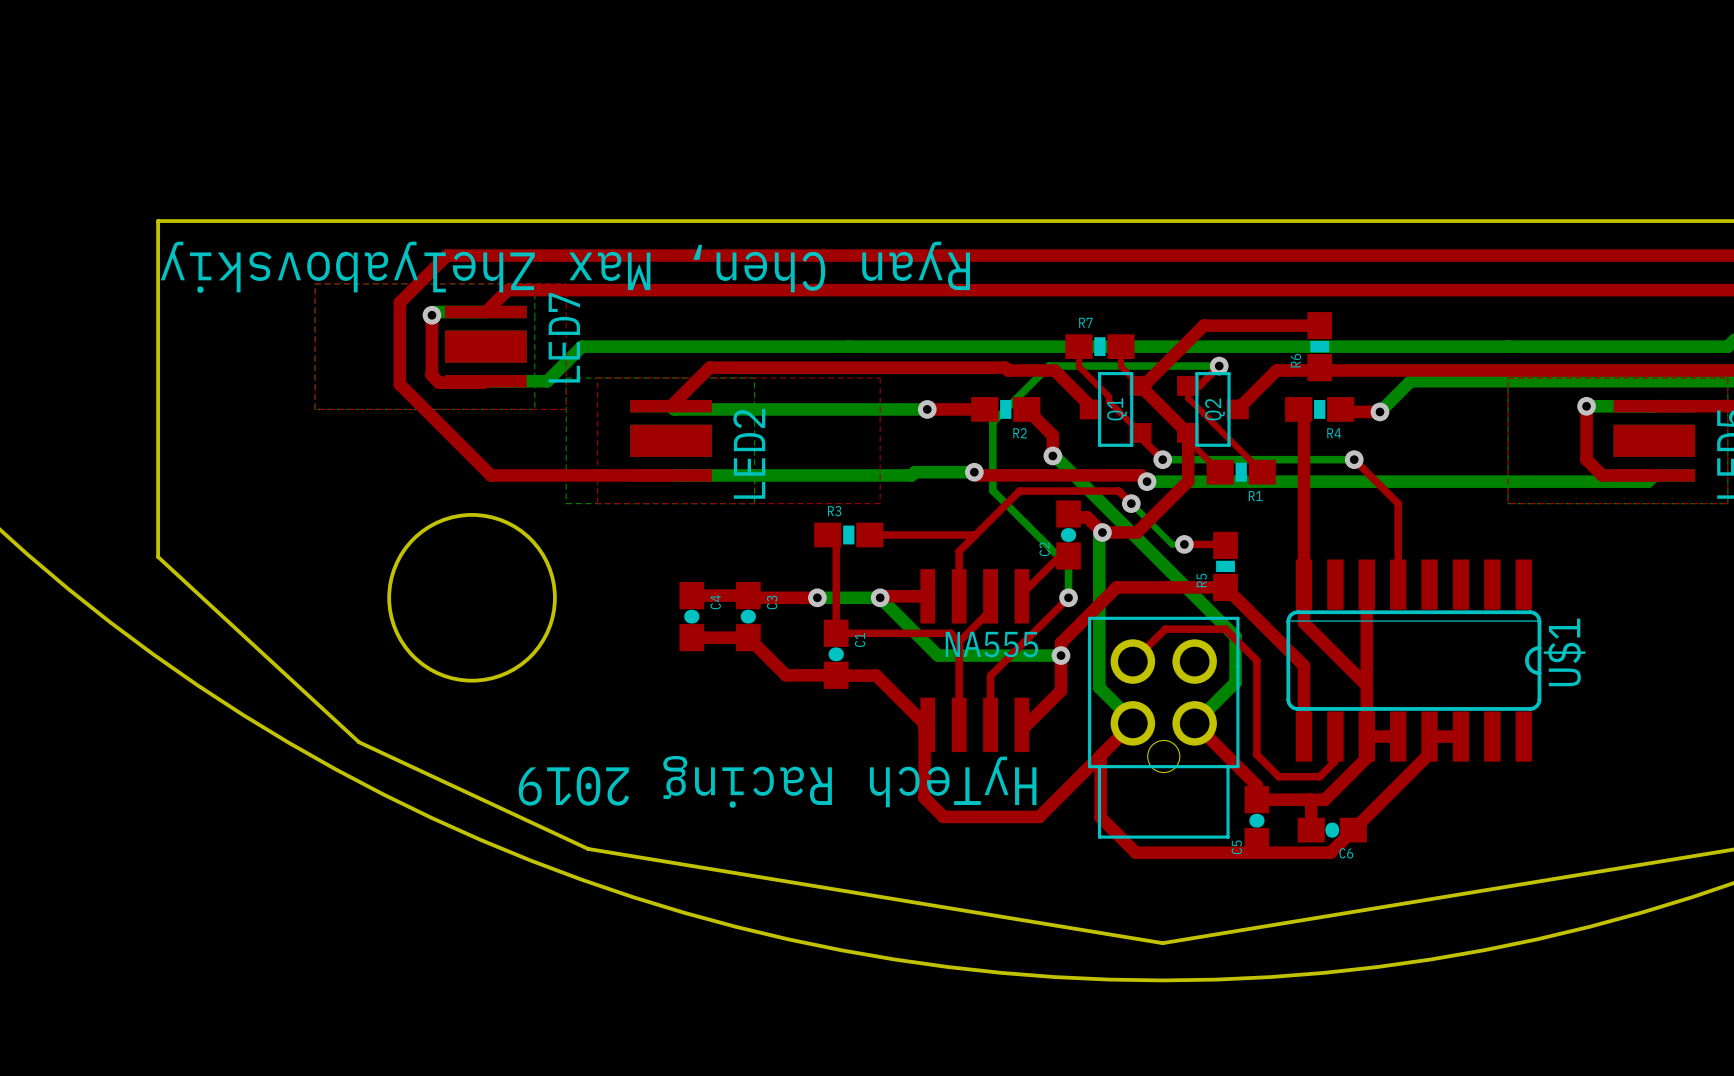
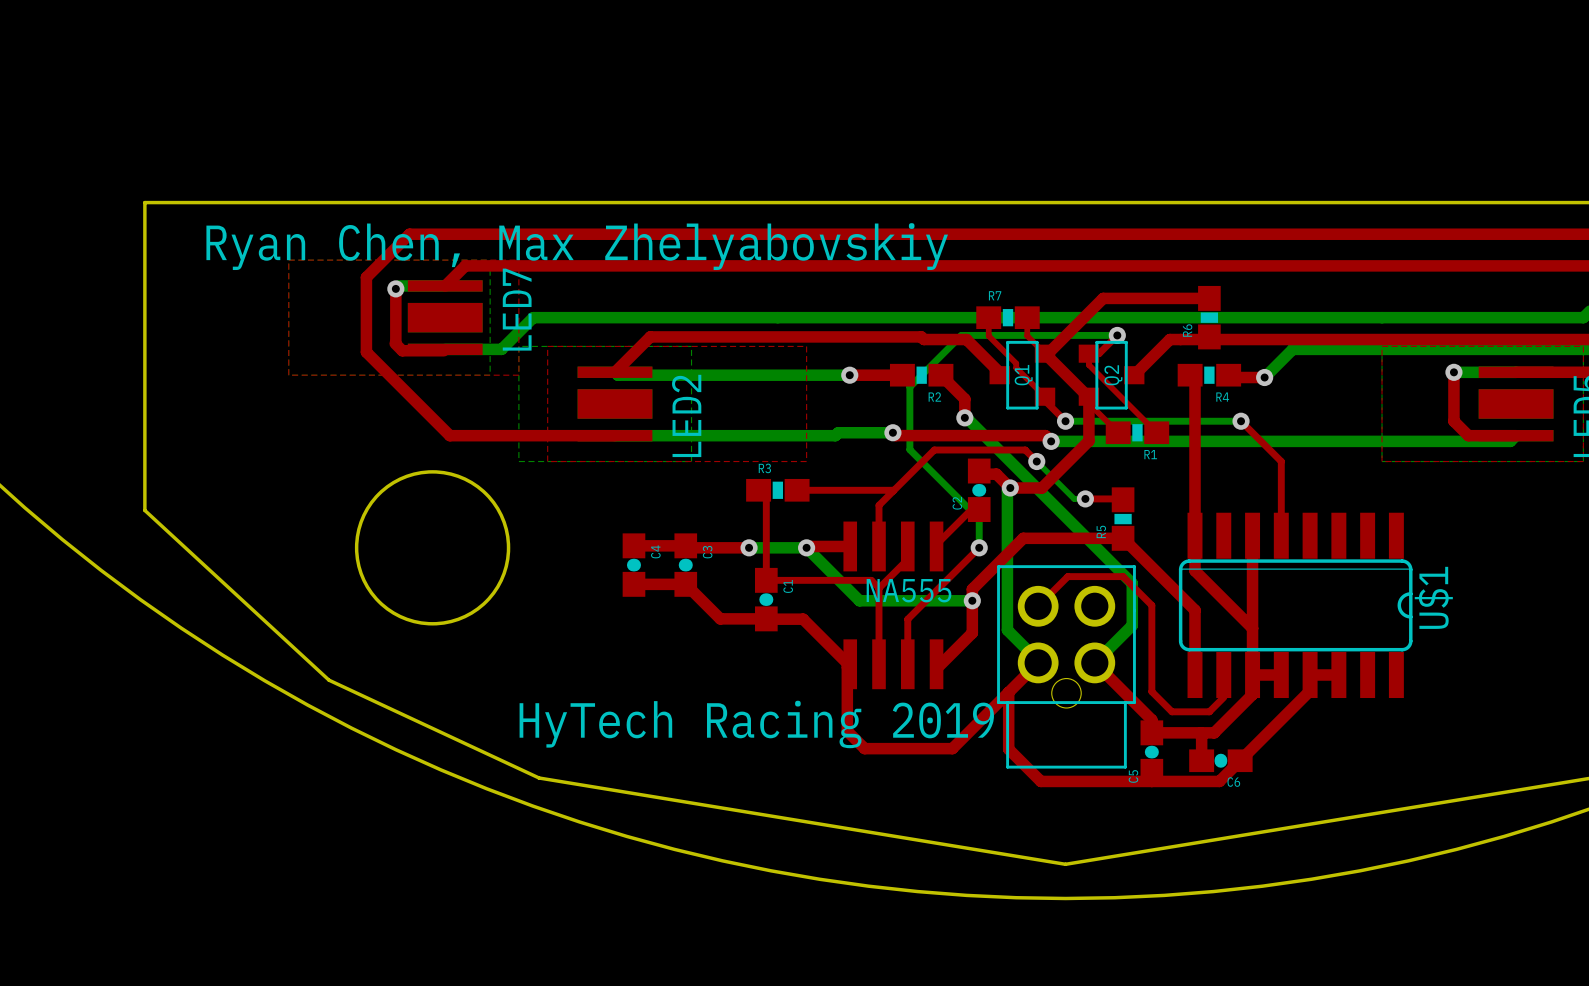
text: Ryan Chen, Max Zhelyabovskiy (565, 267) -> none
text: none -> Ryan Chen, Max Zhelyabovskiy (577, 246)
text rotation: 0° (777, 781) -> 180° (756, 724)

